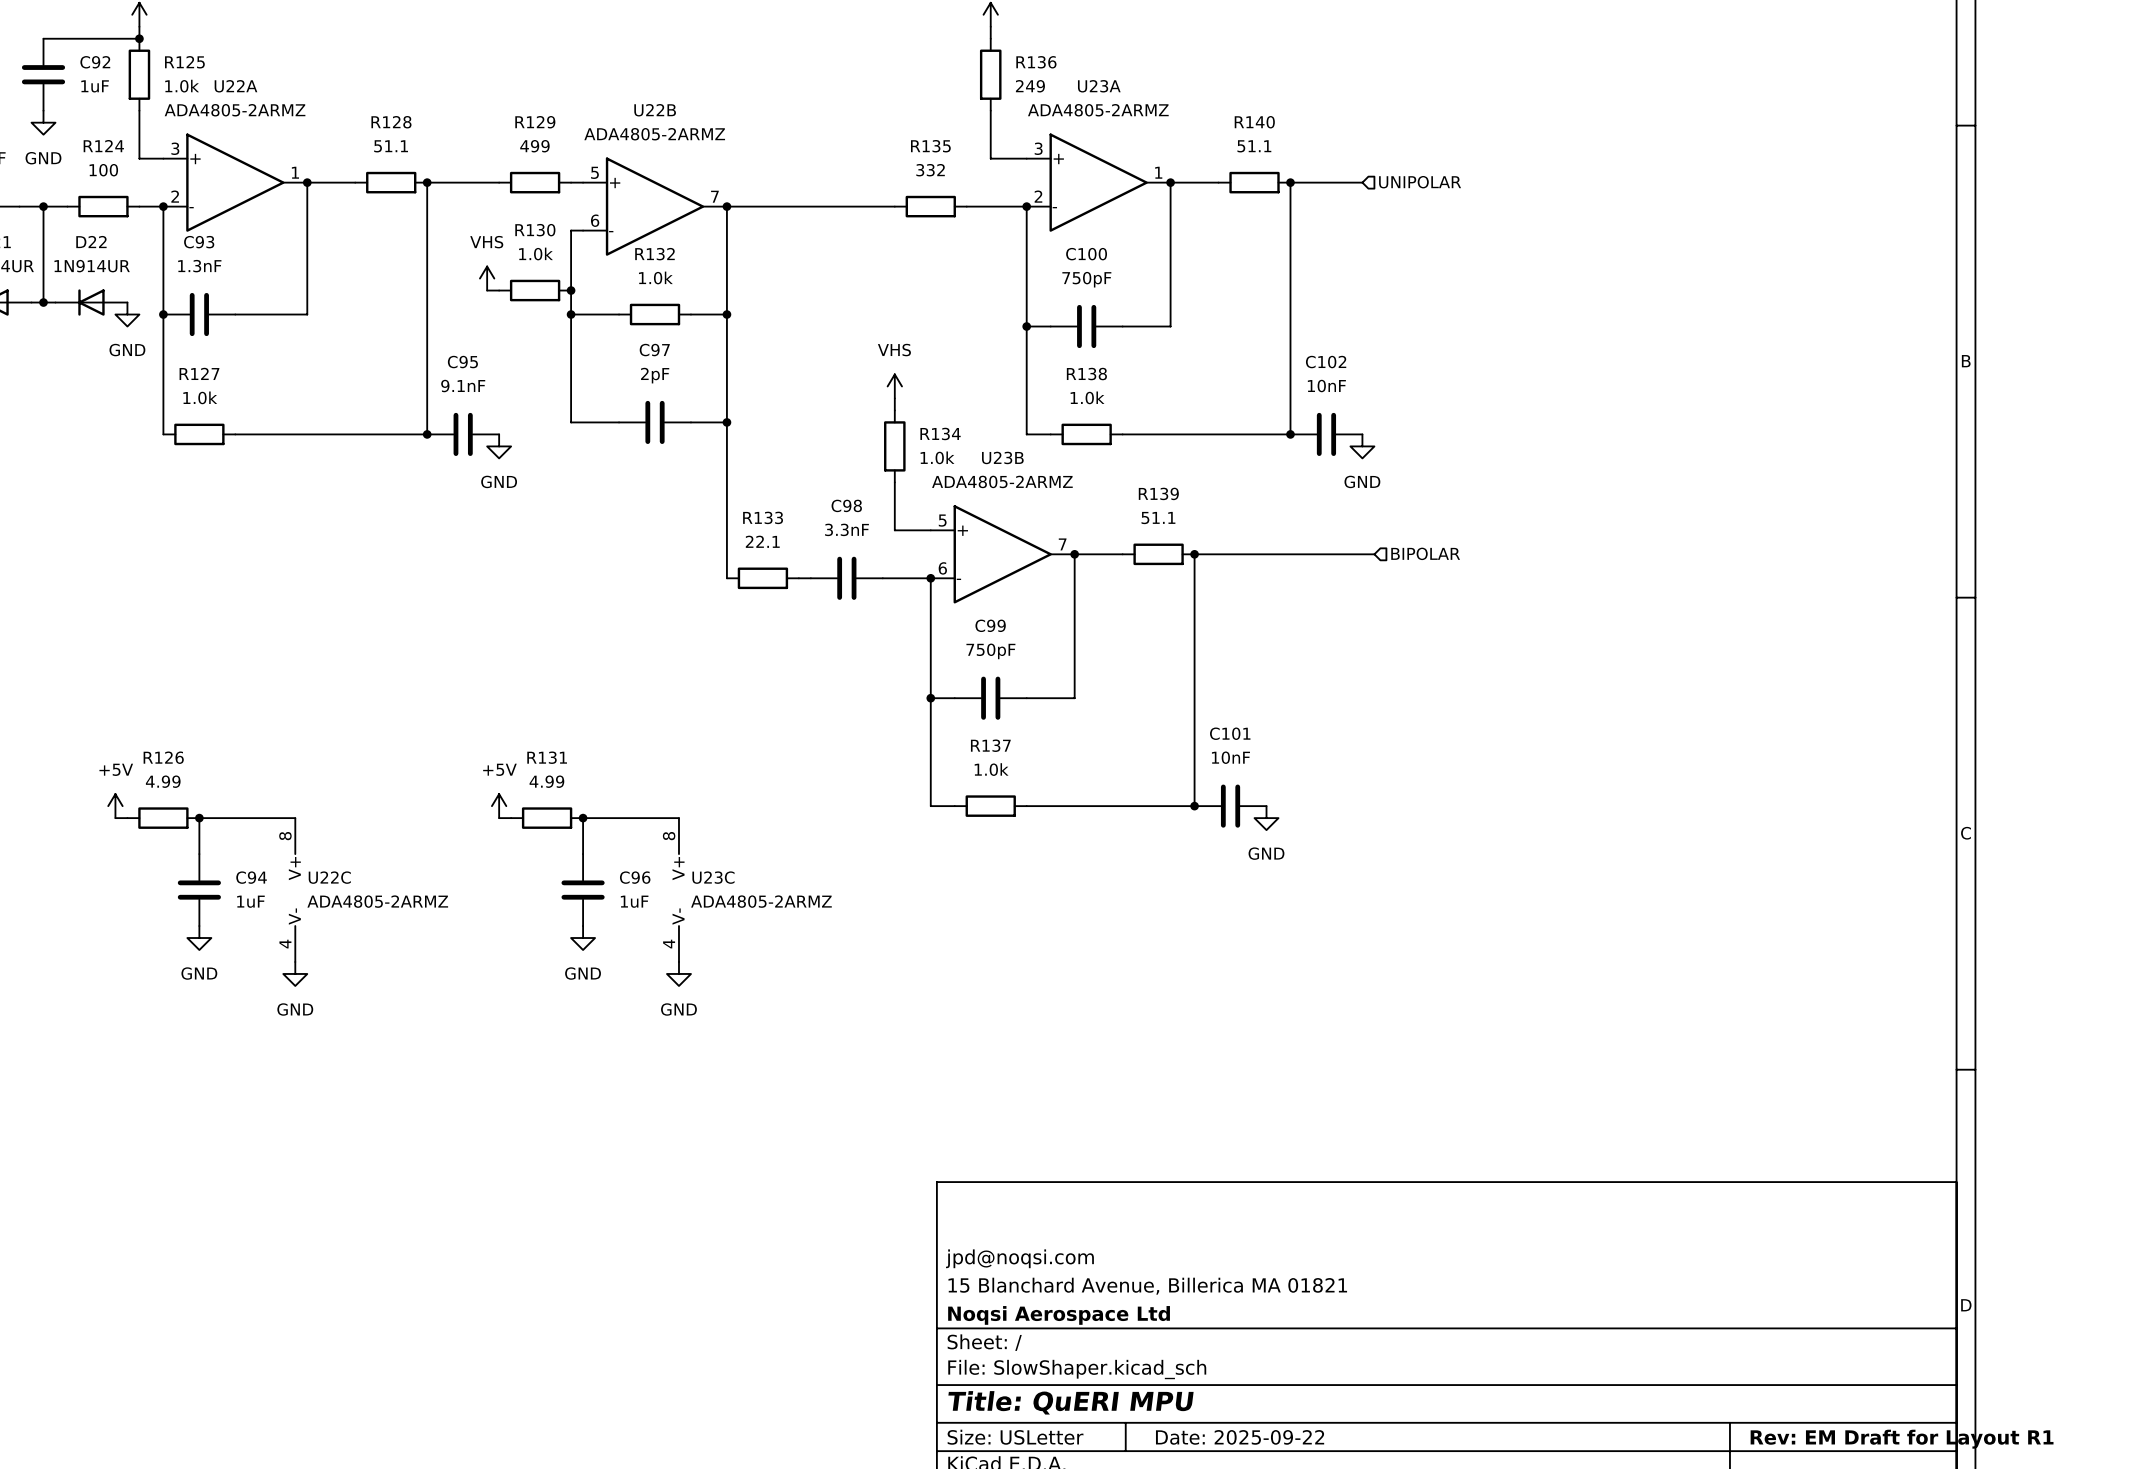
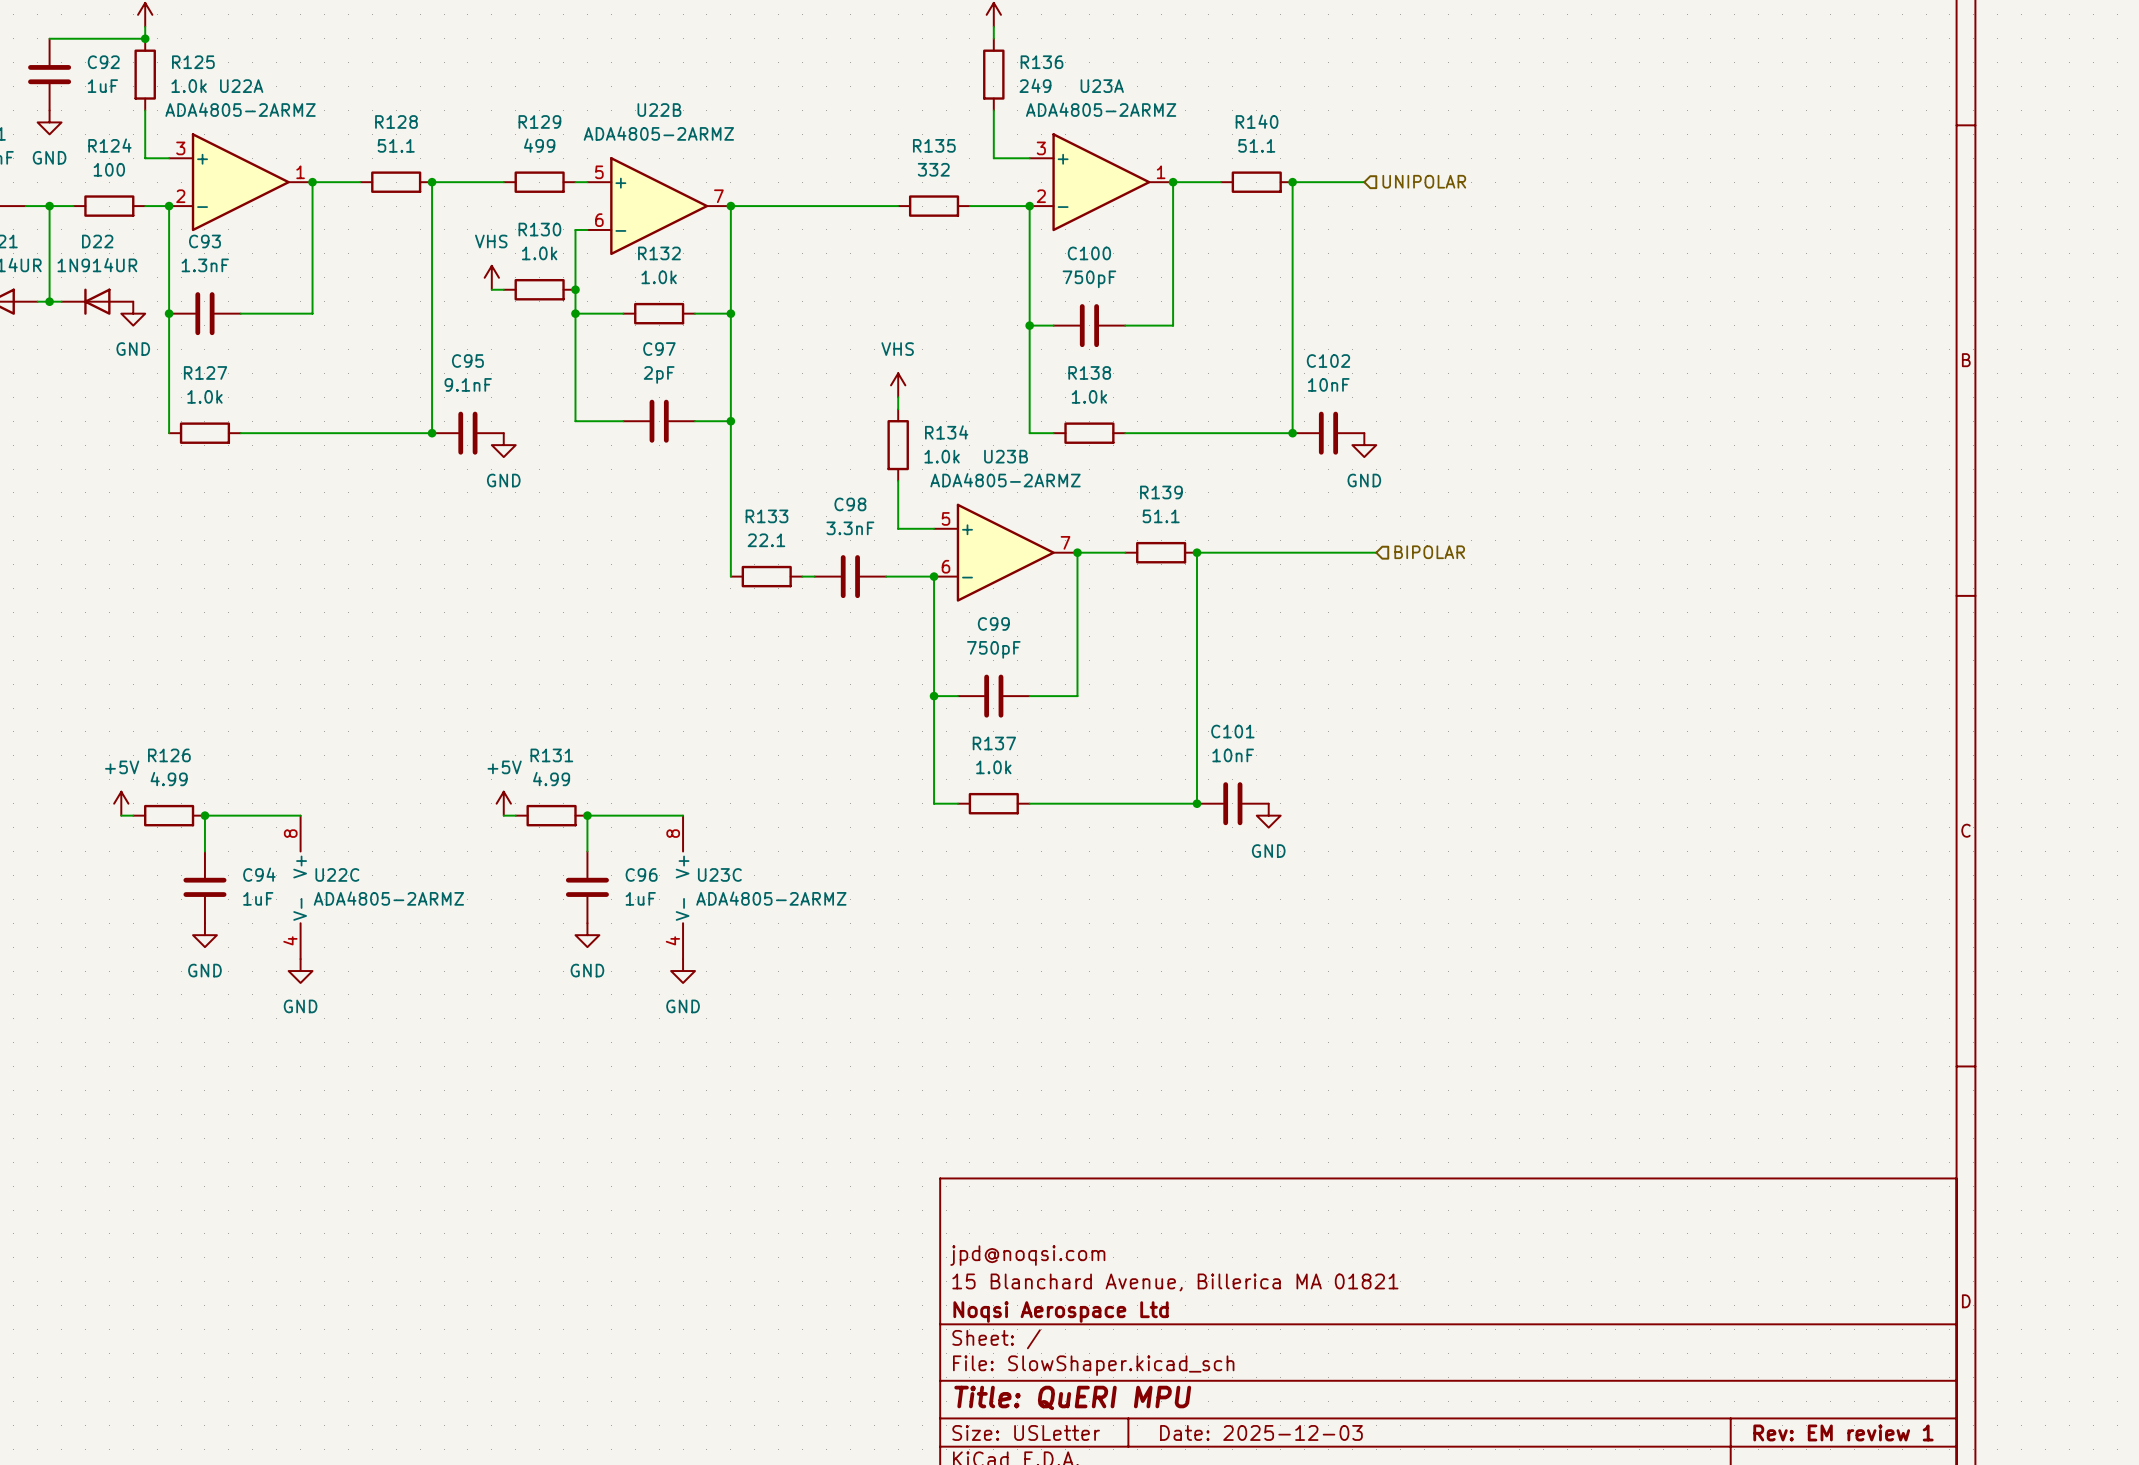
title block: Date: 2025-09-22 (1240, 1437) -> Date: 2025-12-03 (1261, 1432)
title block: Rev: EM Draft for Layout R1 (1902, 1439) -> Rev: EM review 1 (1843, 1432)

